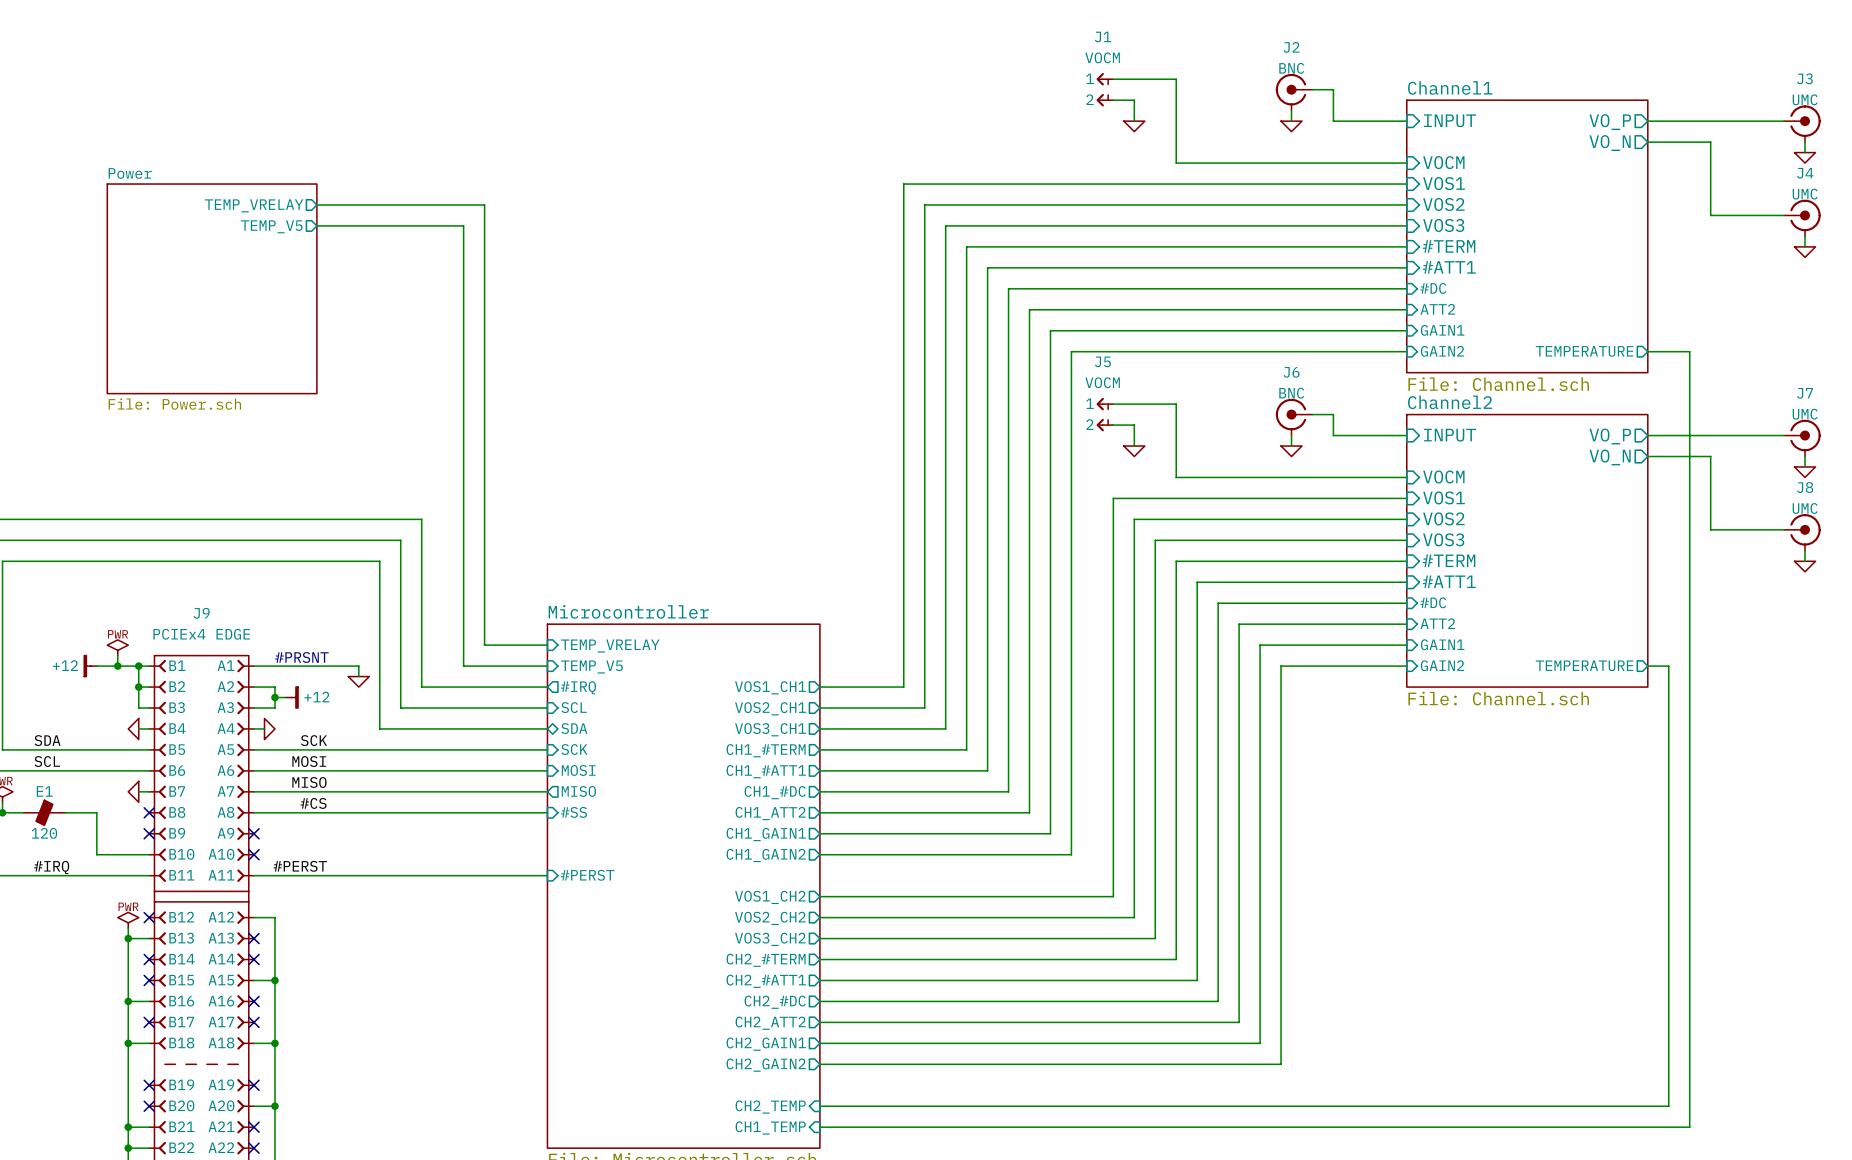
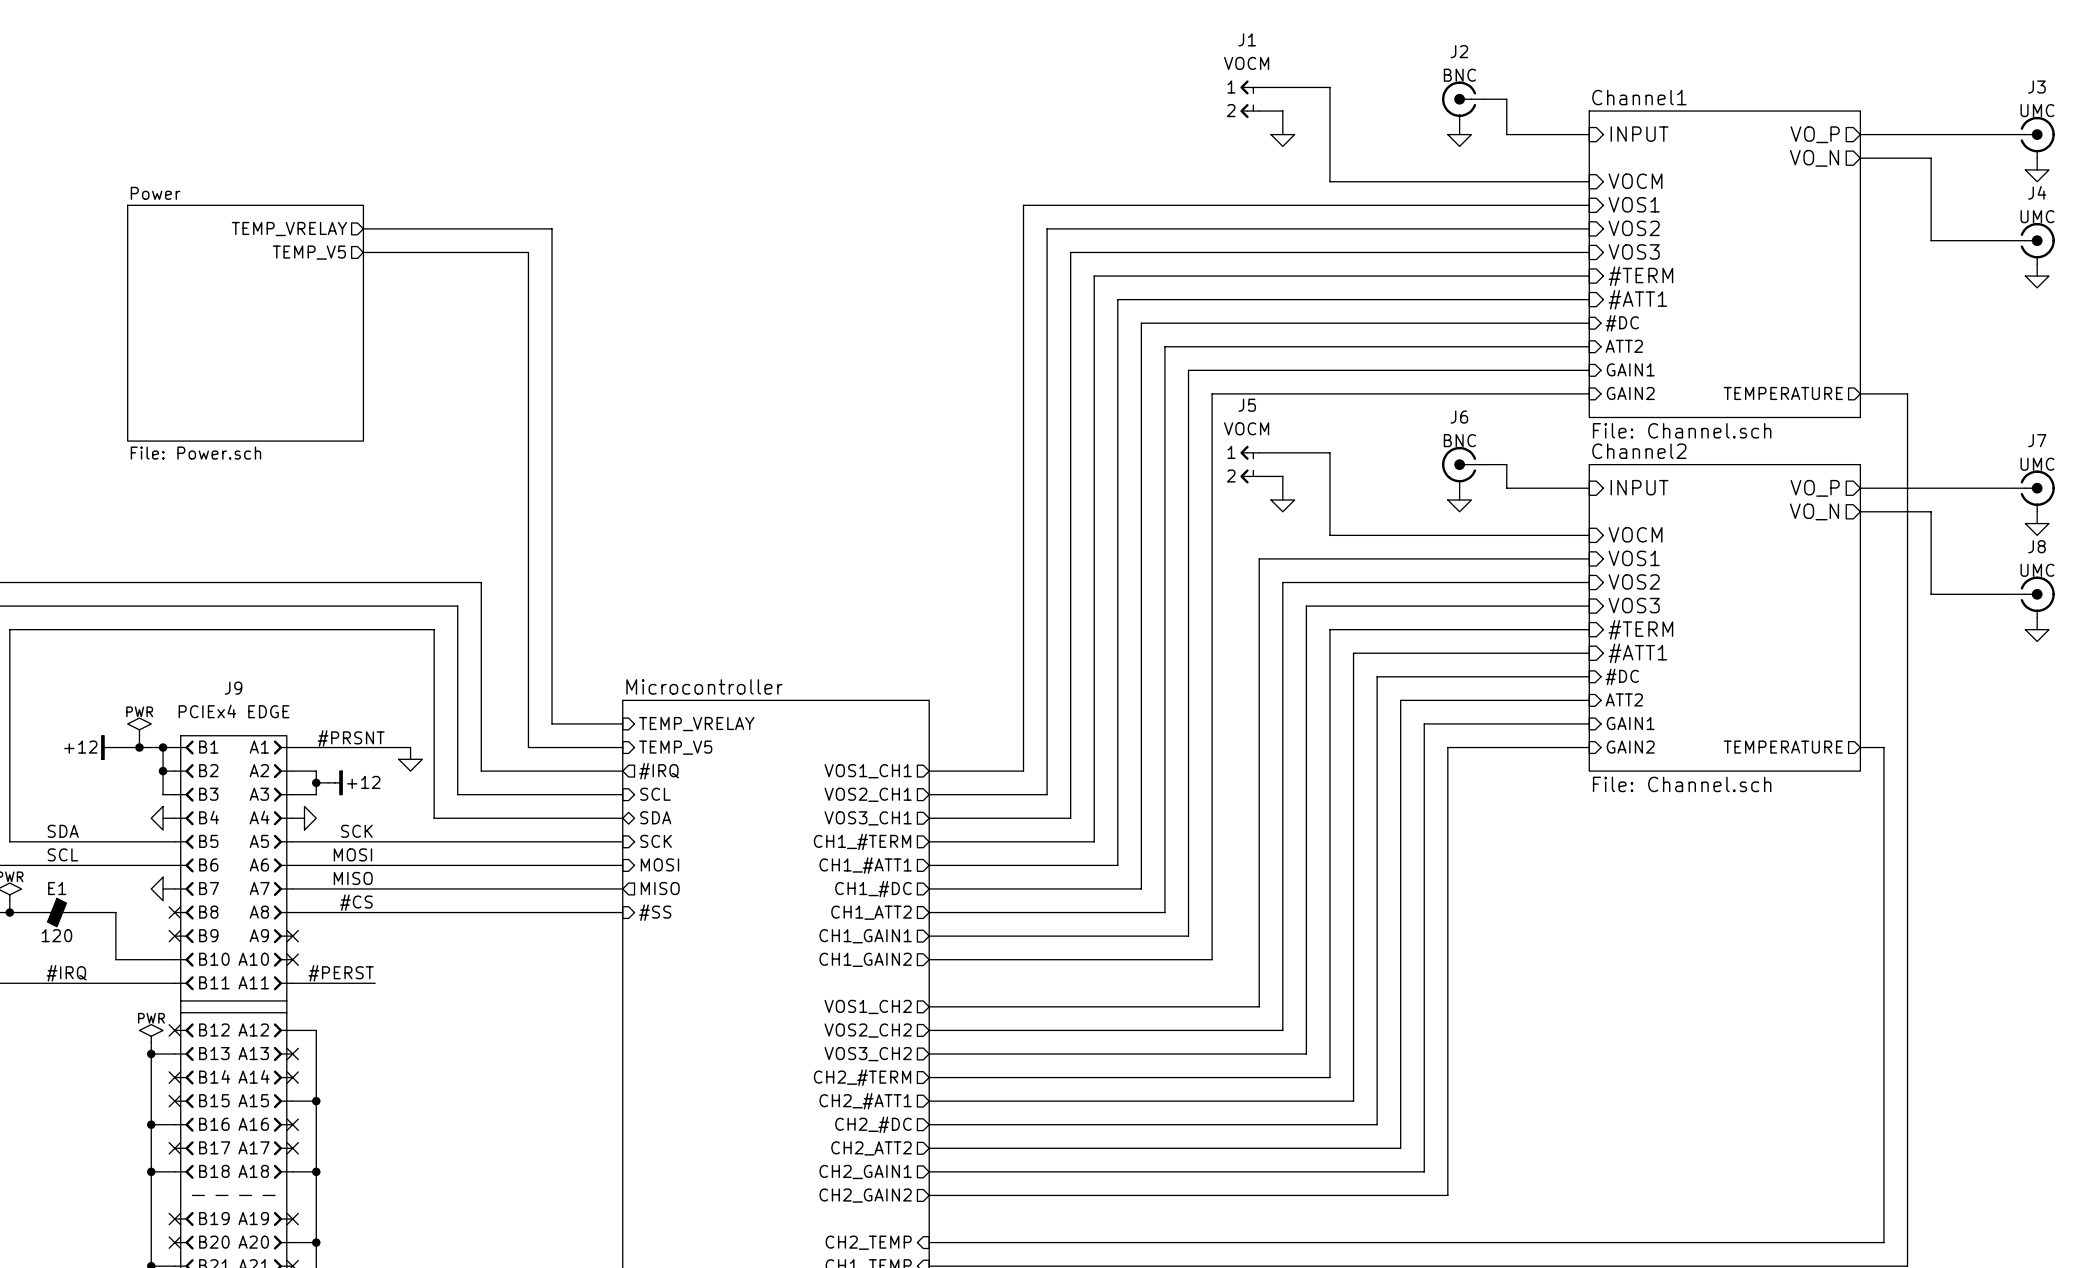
wire: (327, 875) (547, 875) -> none
sheet pin: #PERST (587, 875) -> none

